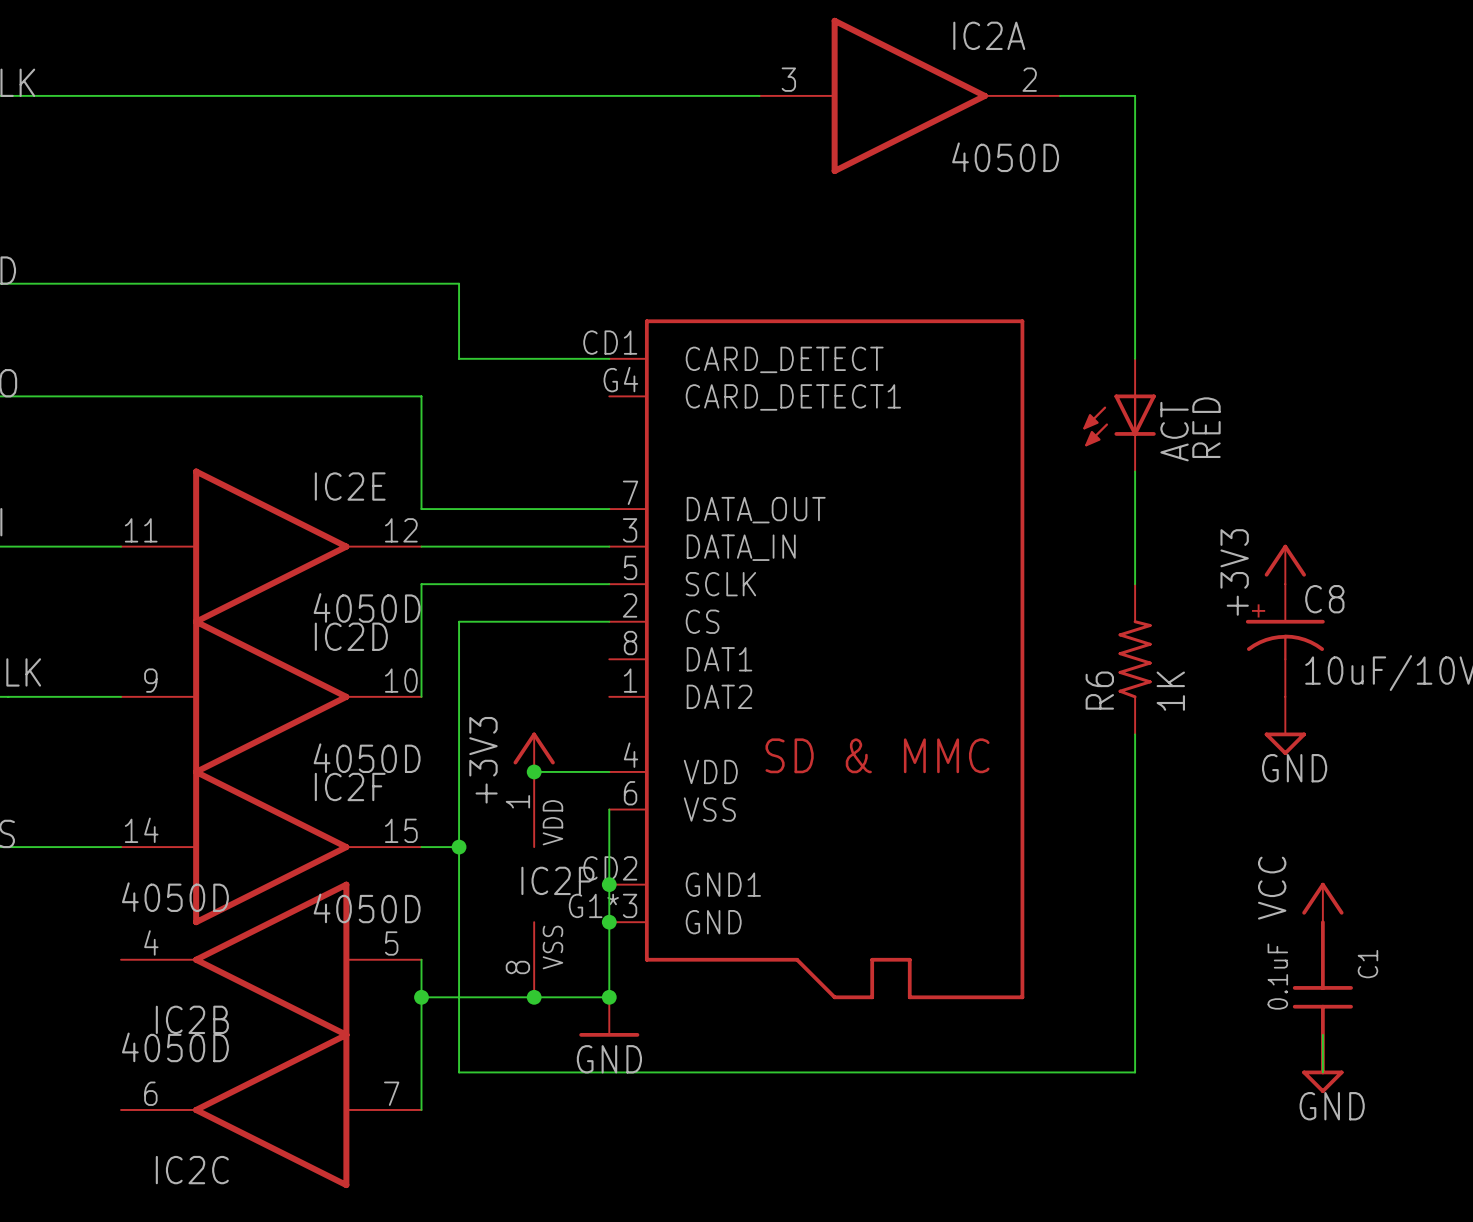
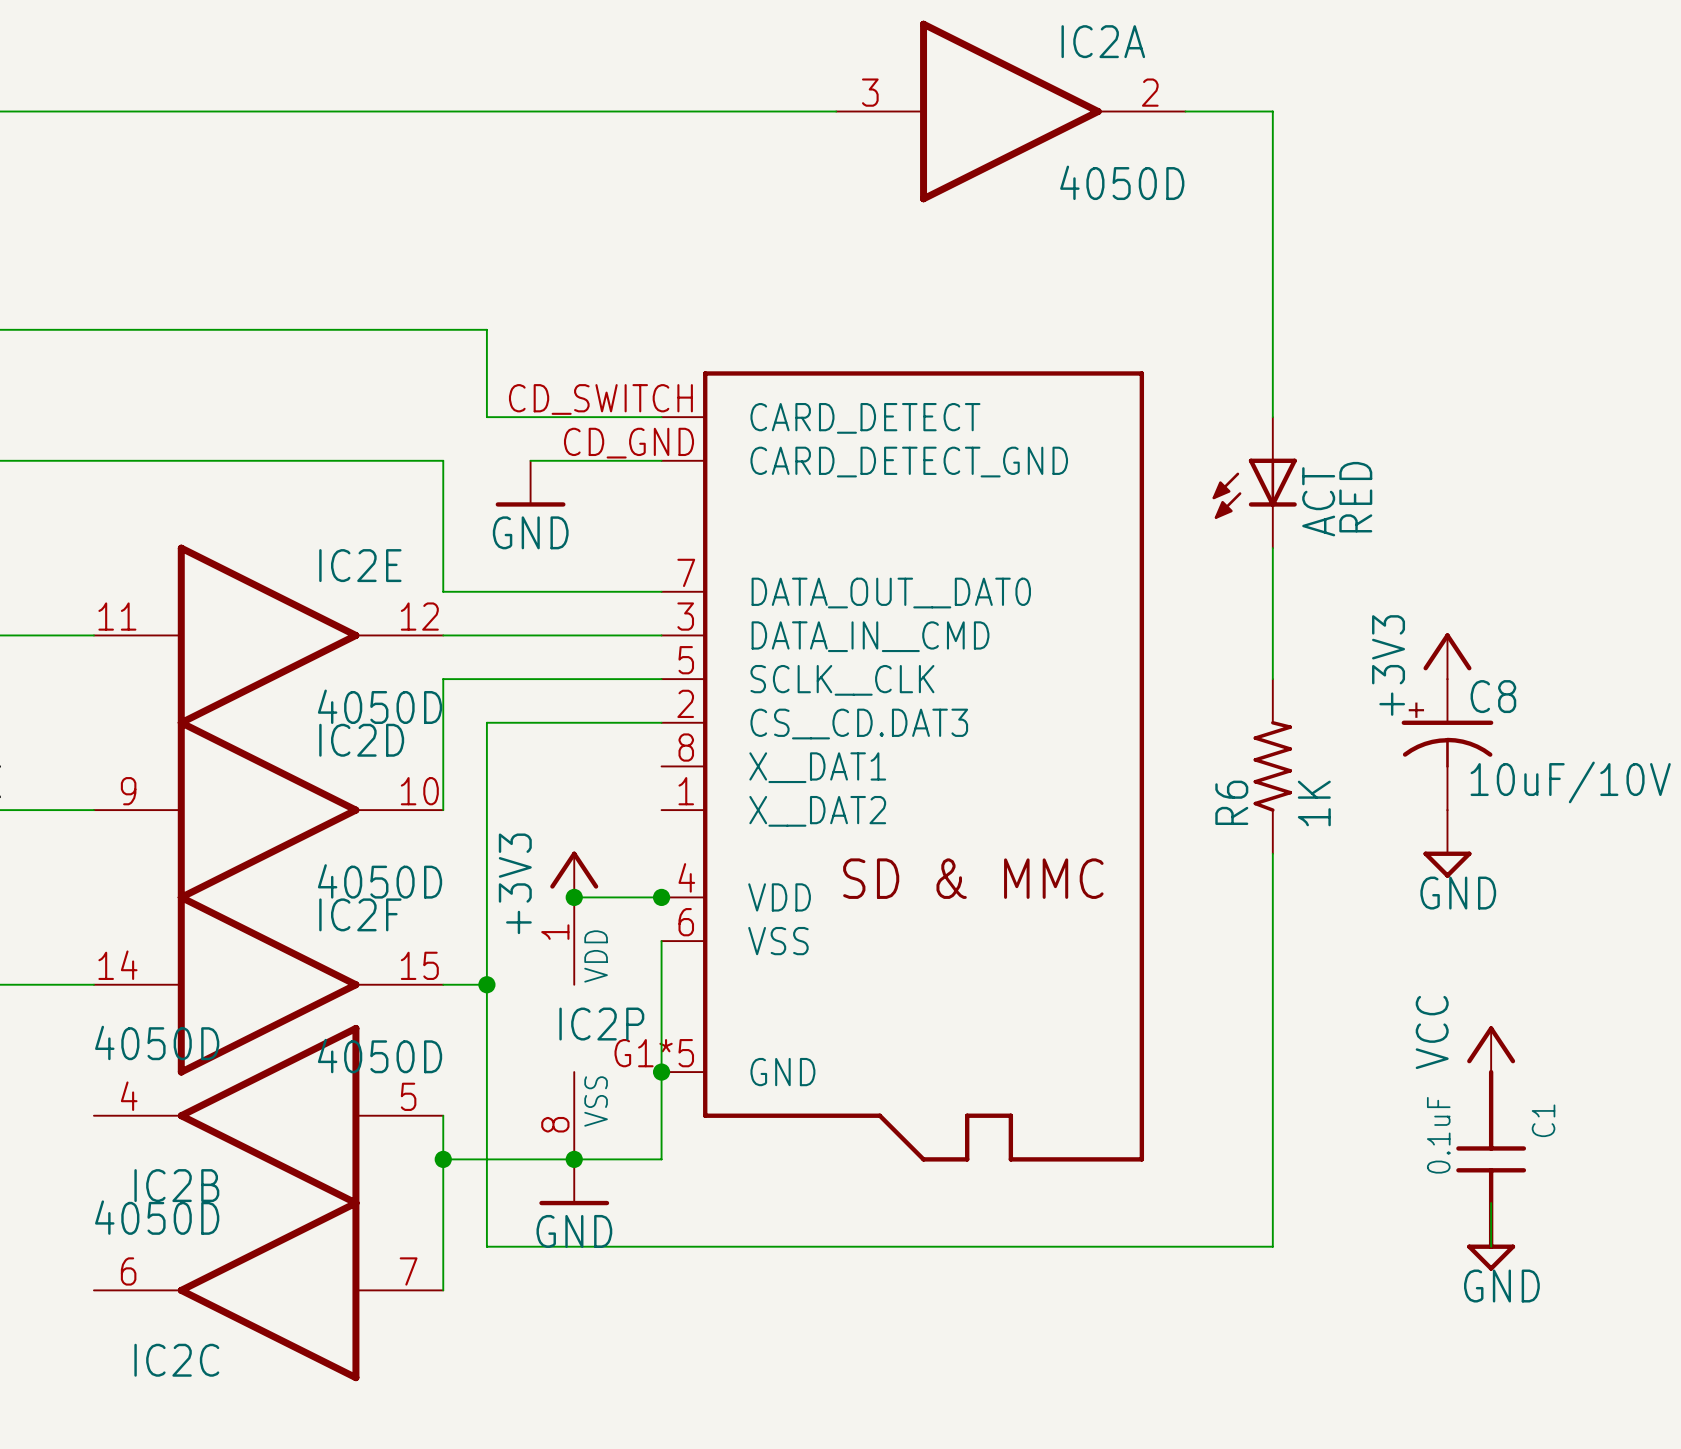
part symbol: [609, 319, 1025, 1000] -> [661, 371, 1145, 1162]
wire: none -> (530, 460) (661, 460)
power symbol: none -> GND (530, 483)
junction: none -> (661, 897)
junction: (609, 884) -> none
junction: (609, 997) -> none
power symbol position: GND (609, 1017) -> GND (574, 1182)

